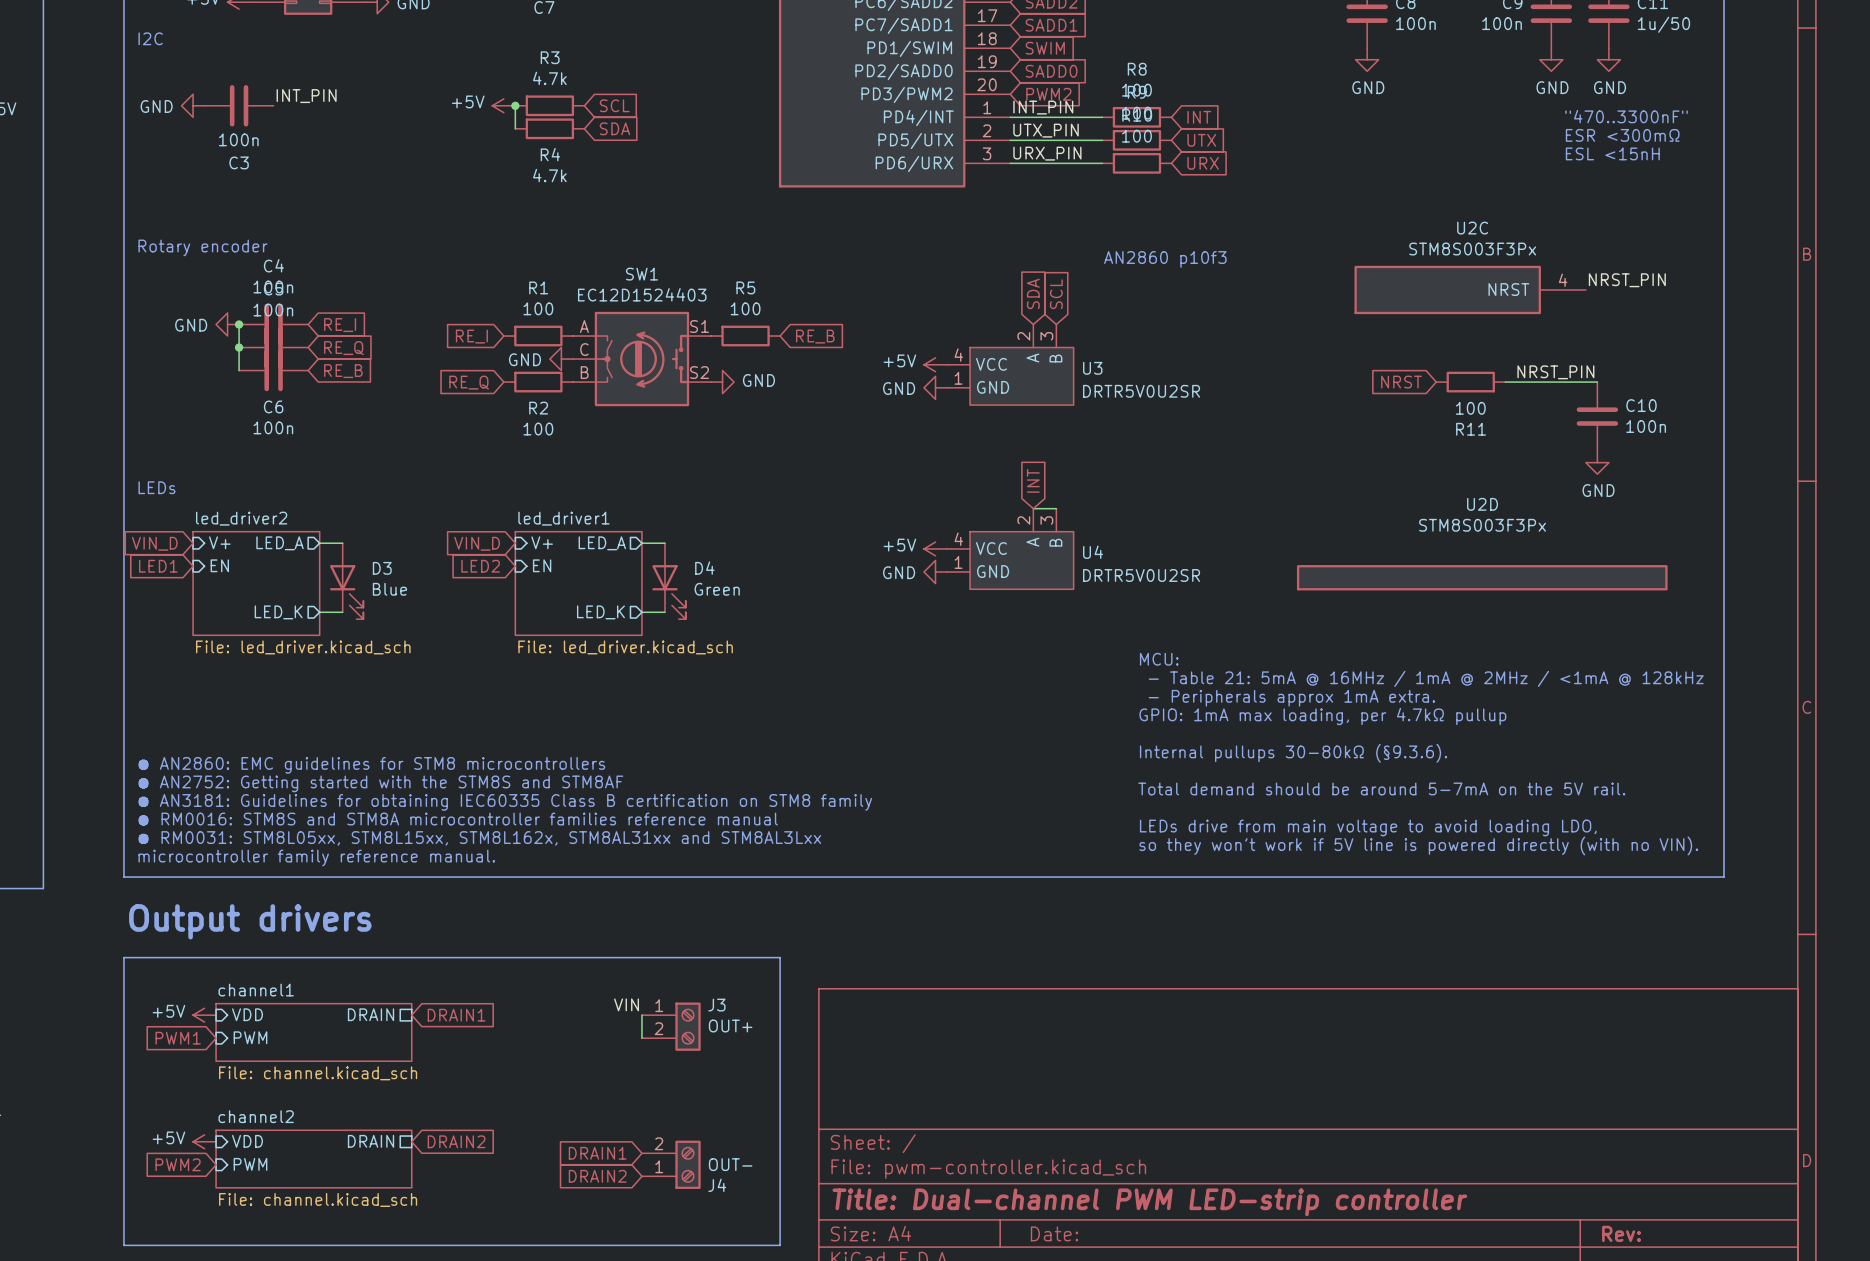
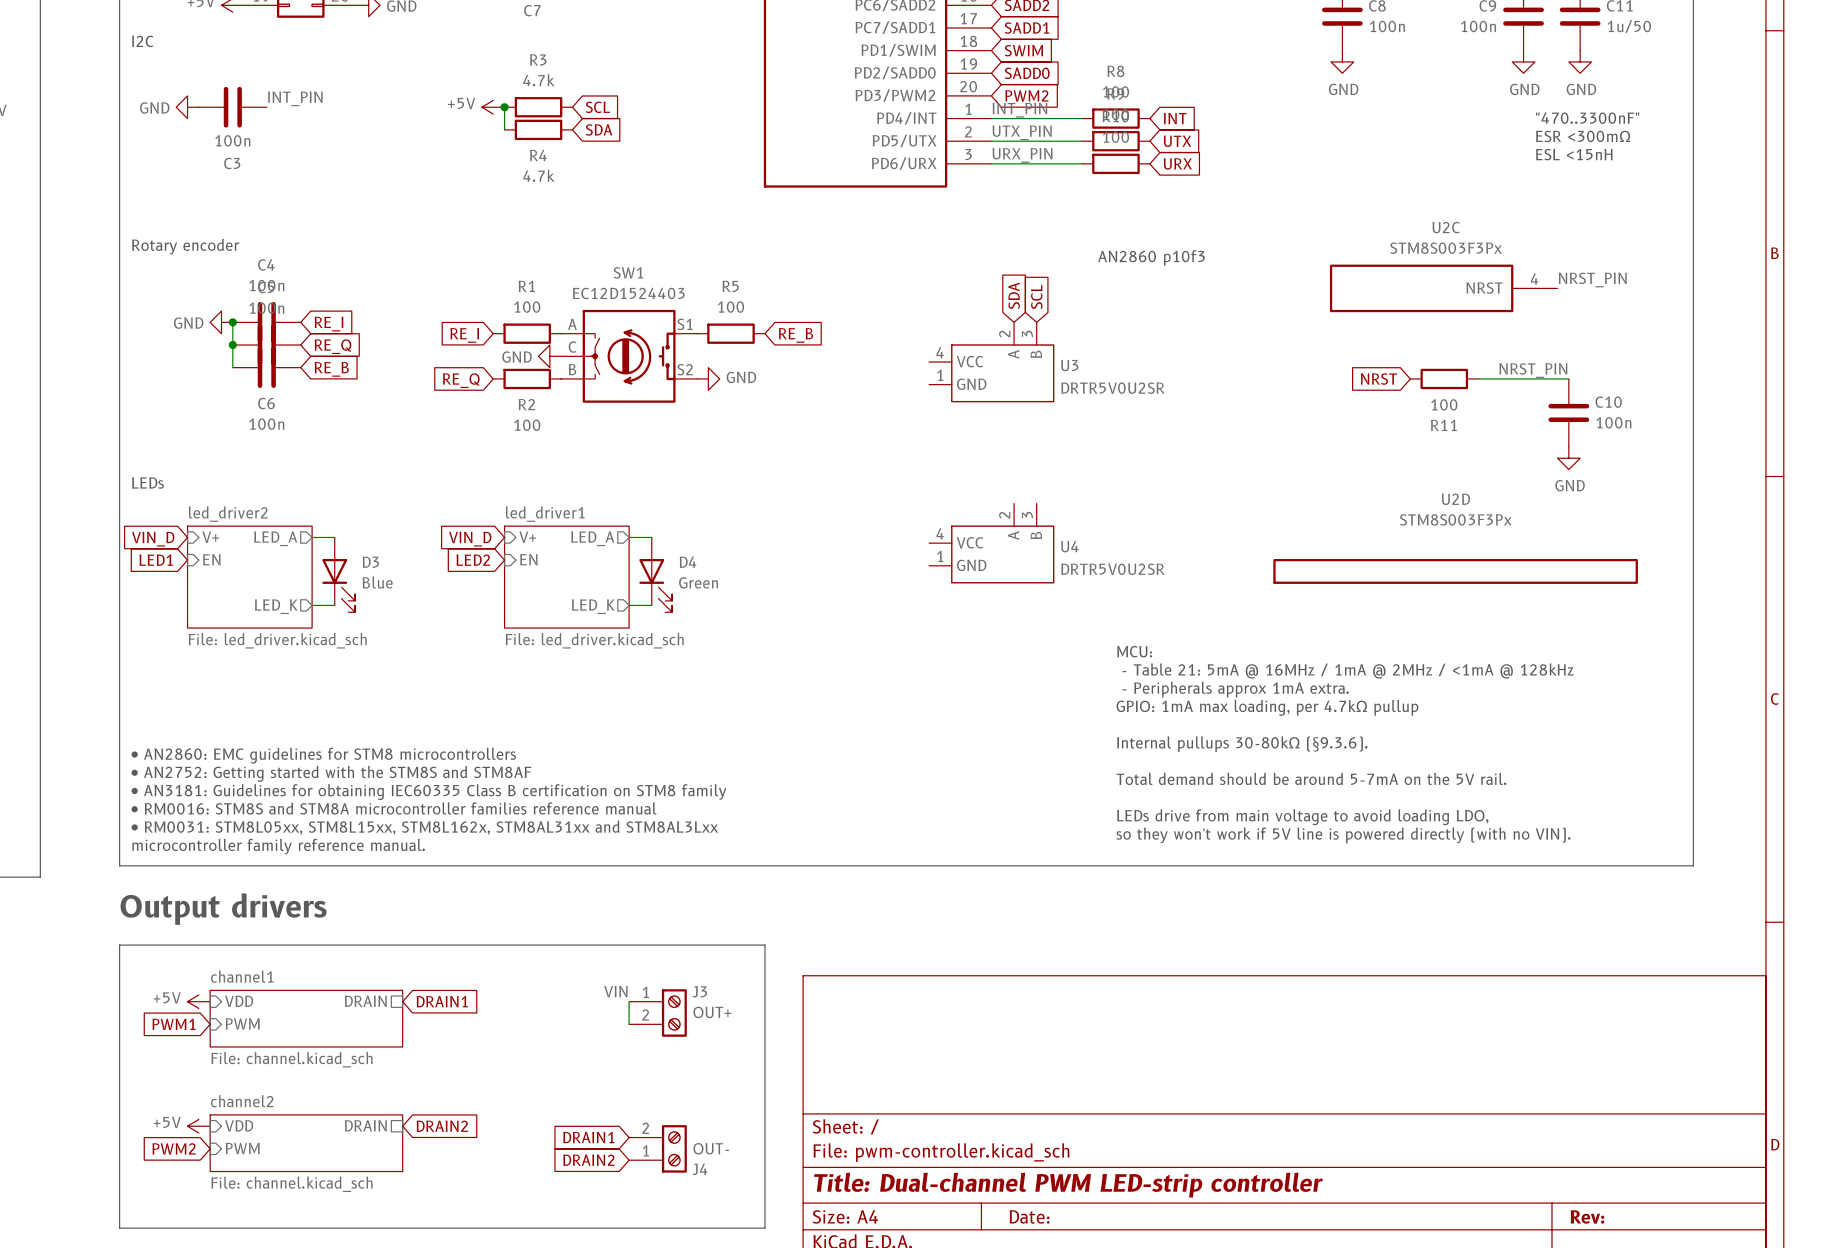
power symbol: +5V (935, 364) -> none
power symbol: GND (935, 387) -> none
global label: INT (1033, 480) -> none
wire: (1033, 508) (1056, 508) -> none
power symbol: +5V (935, 548) -> none
power symbol: GND (935, 571) -> none

